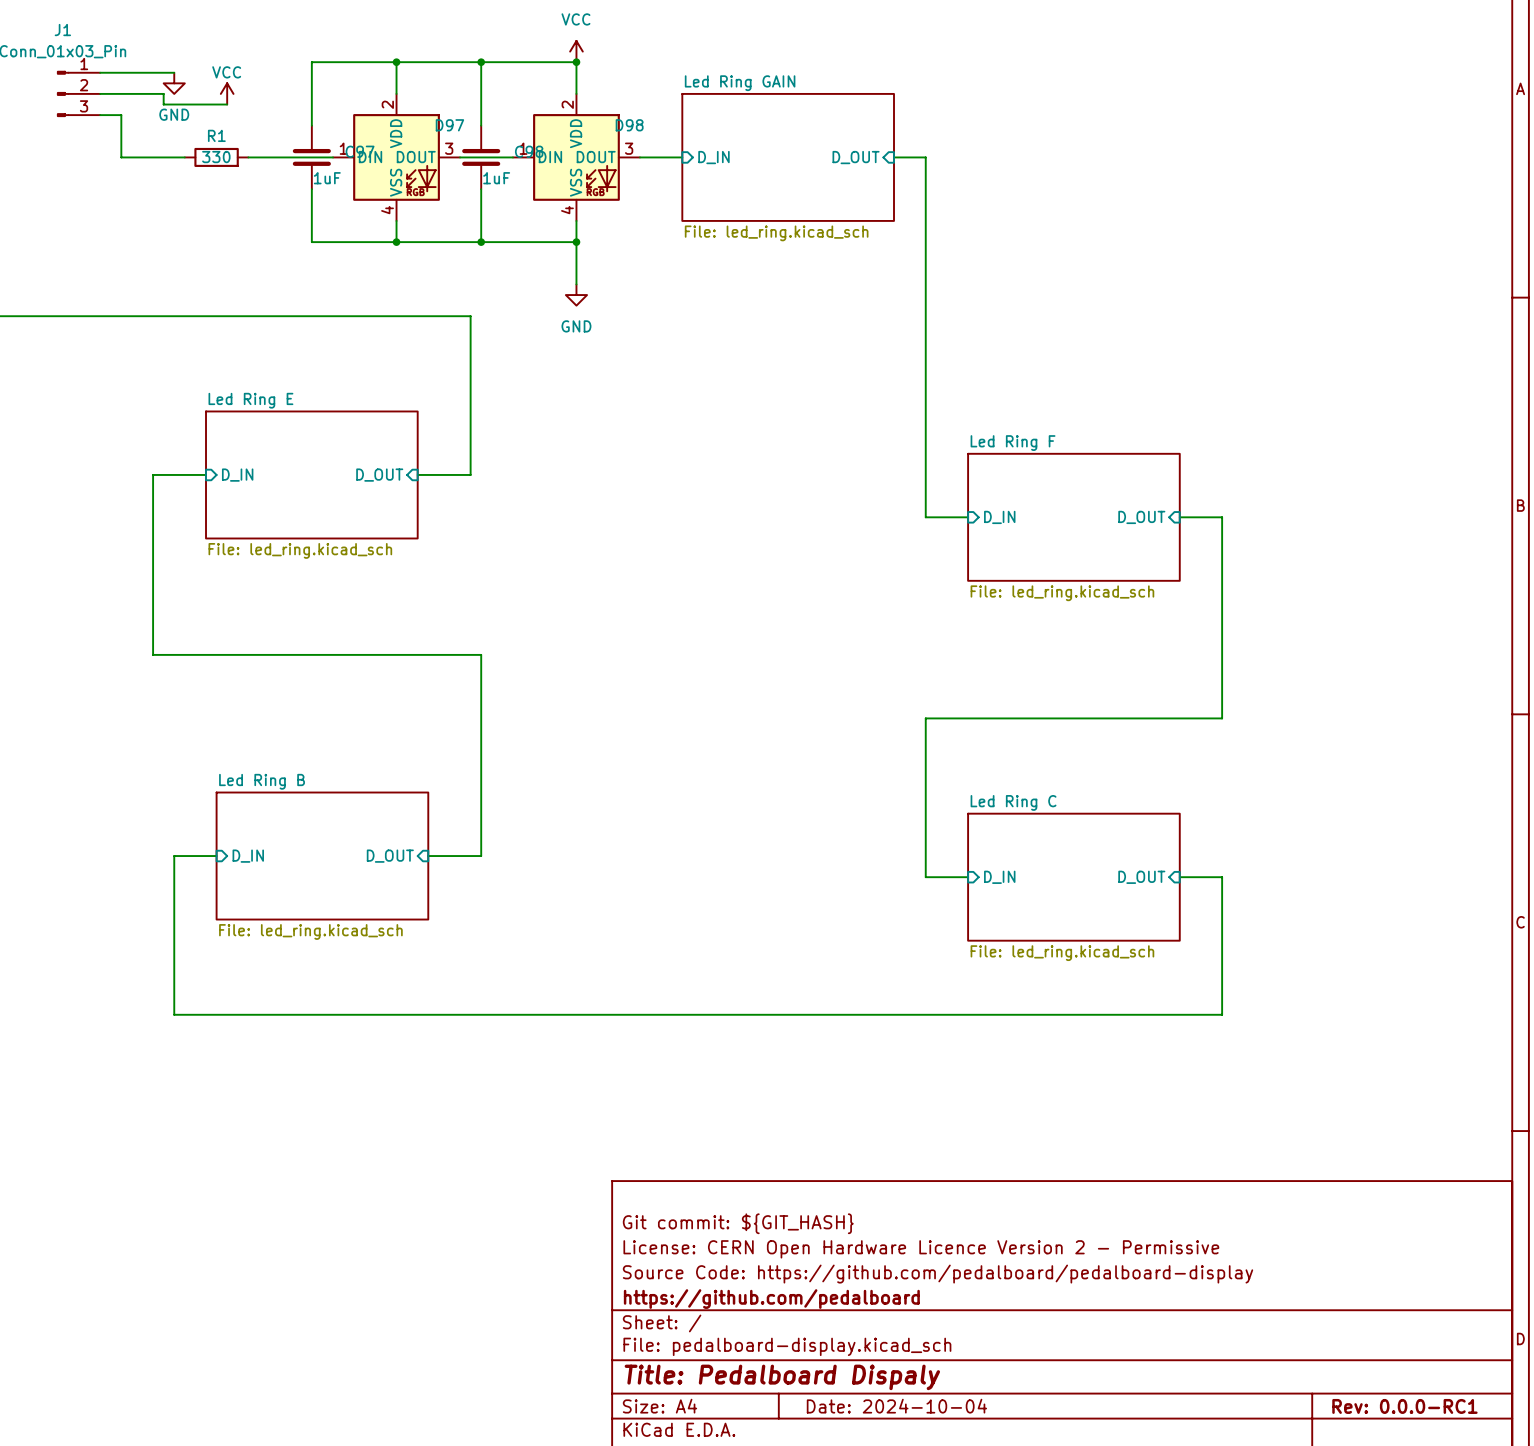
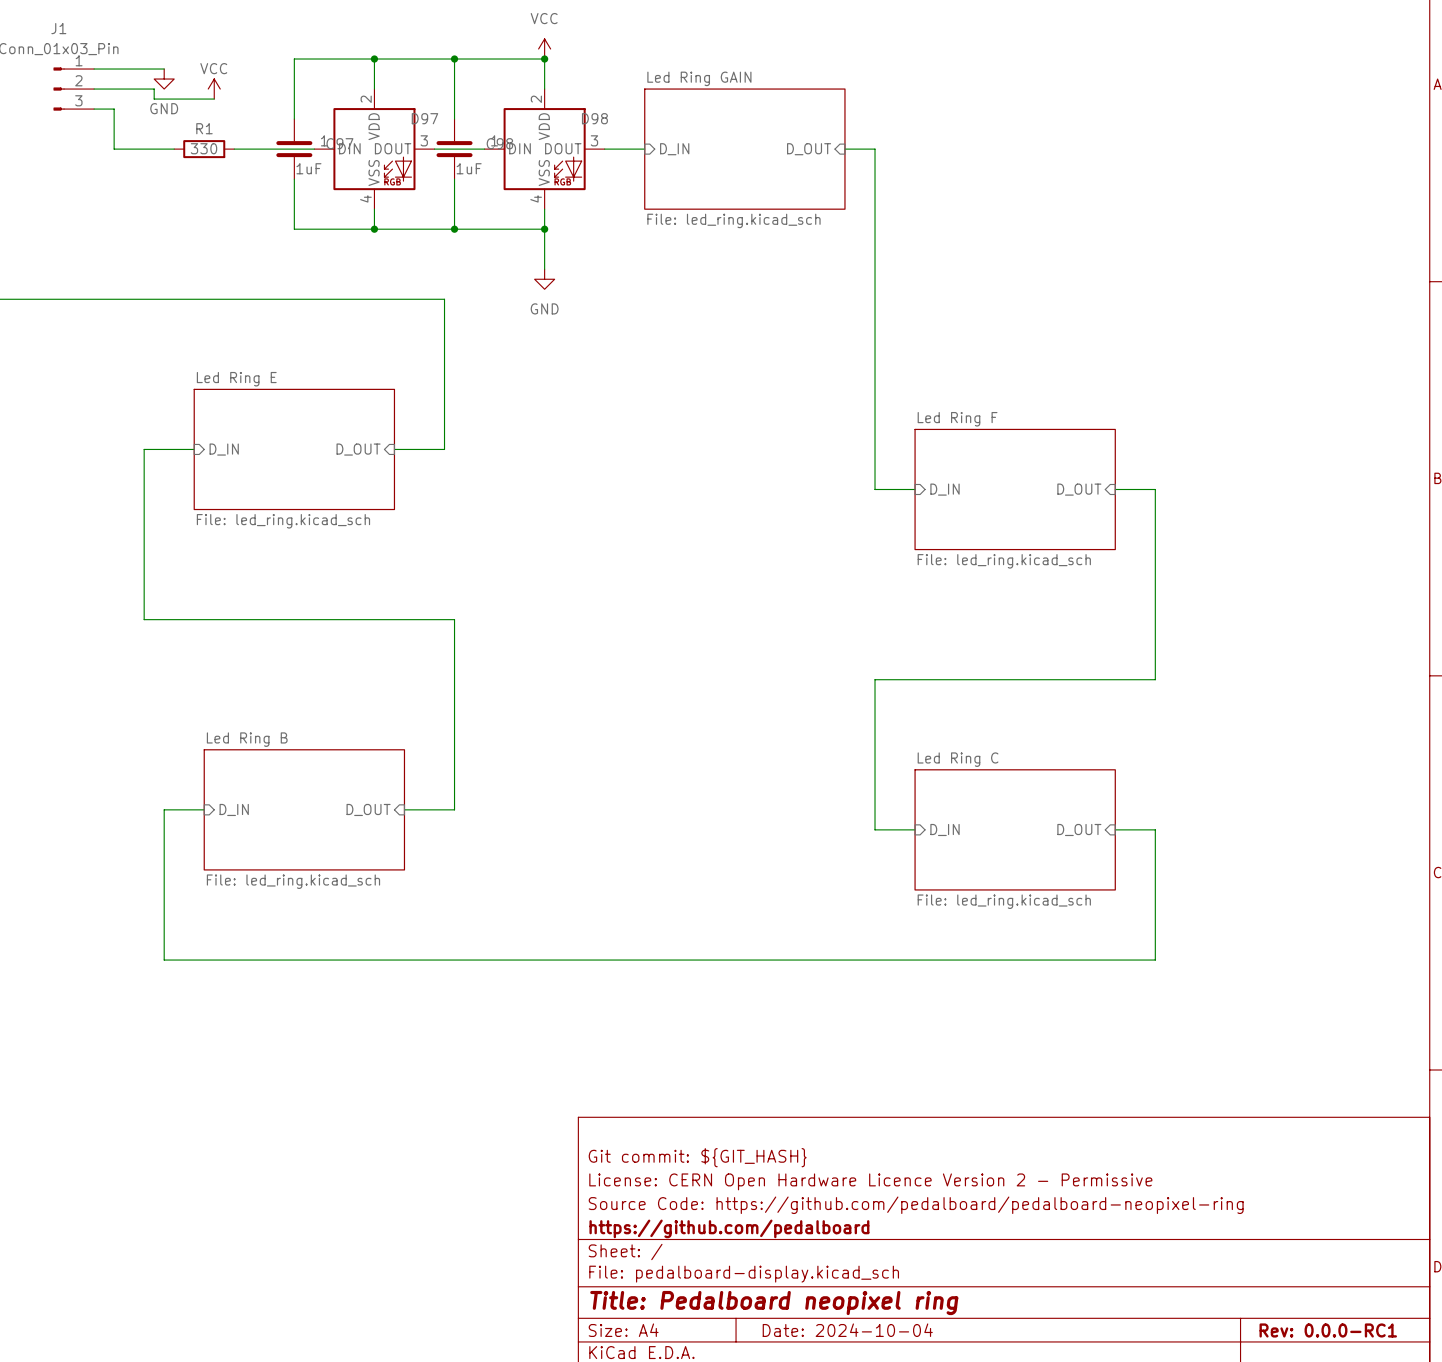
title block: Source Code: https://github.com/pedalboard/pedalboard-display (938, 1274) -> Source Code: https://github.com/pedalboard/pedalboard-neopixel-ring (916, 1205)
title block: Title: Pedalboard Dispaly (782, 1377) -> Title: Pedalboard neopixel ring (774, 1303)

